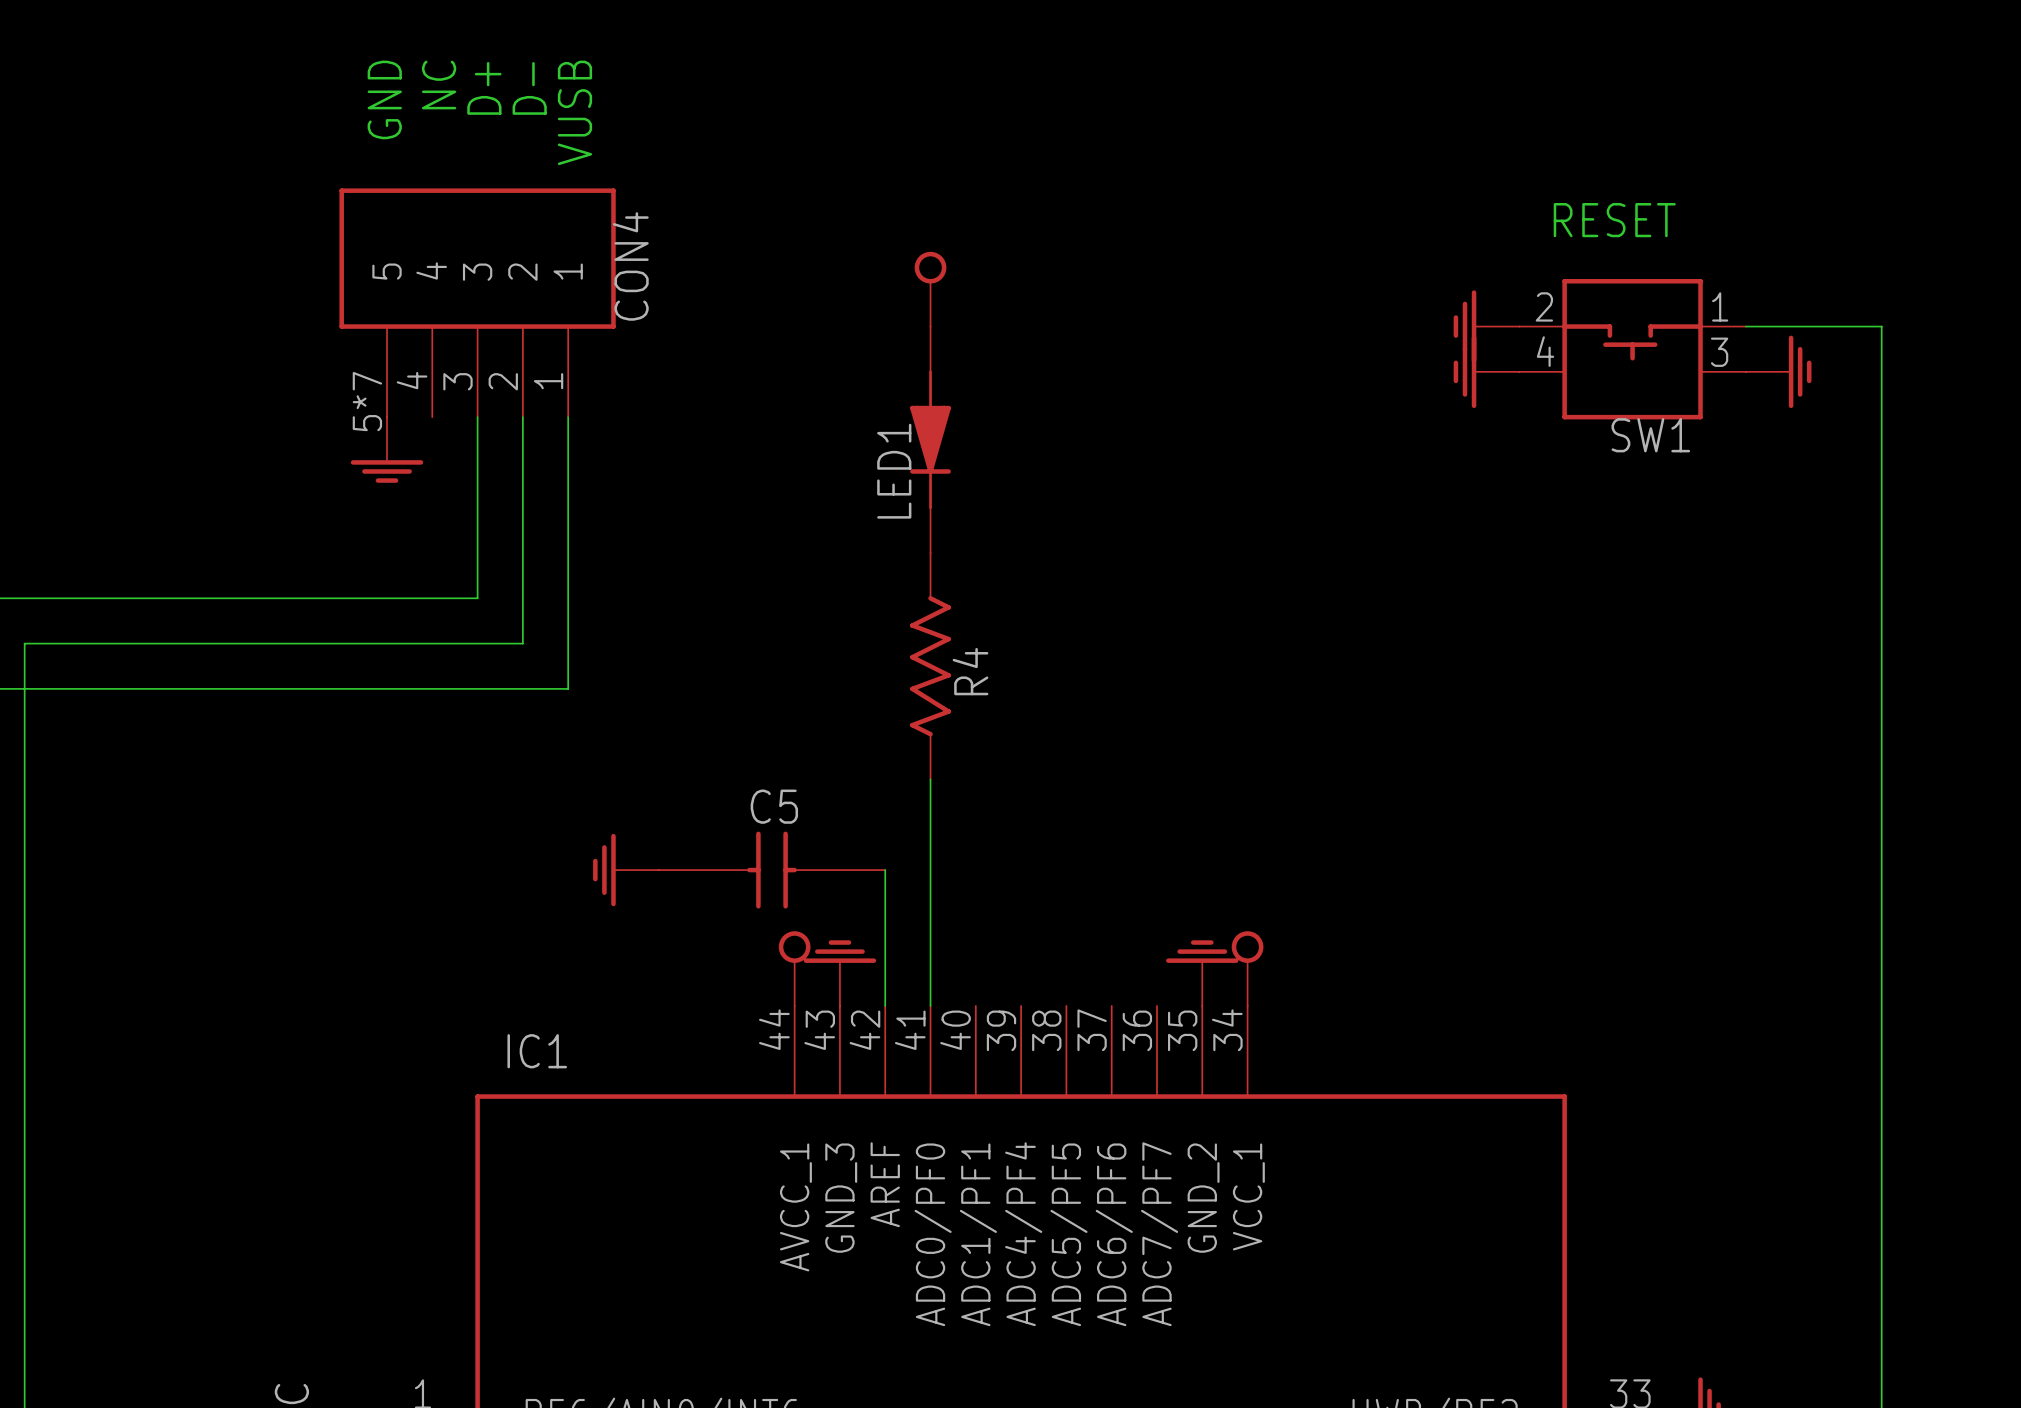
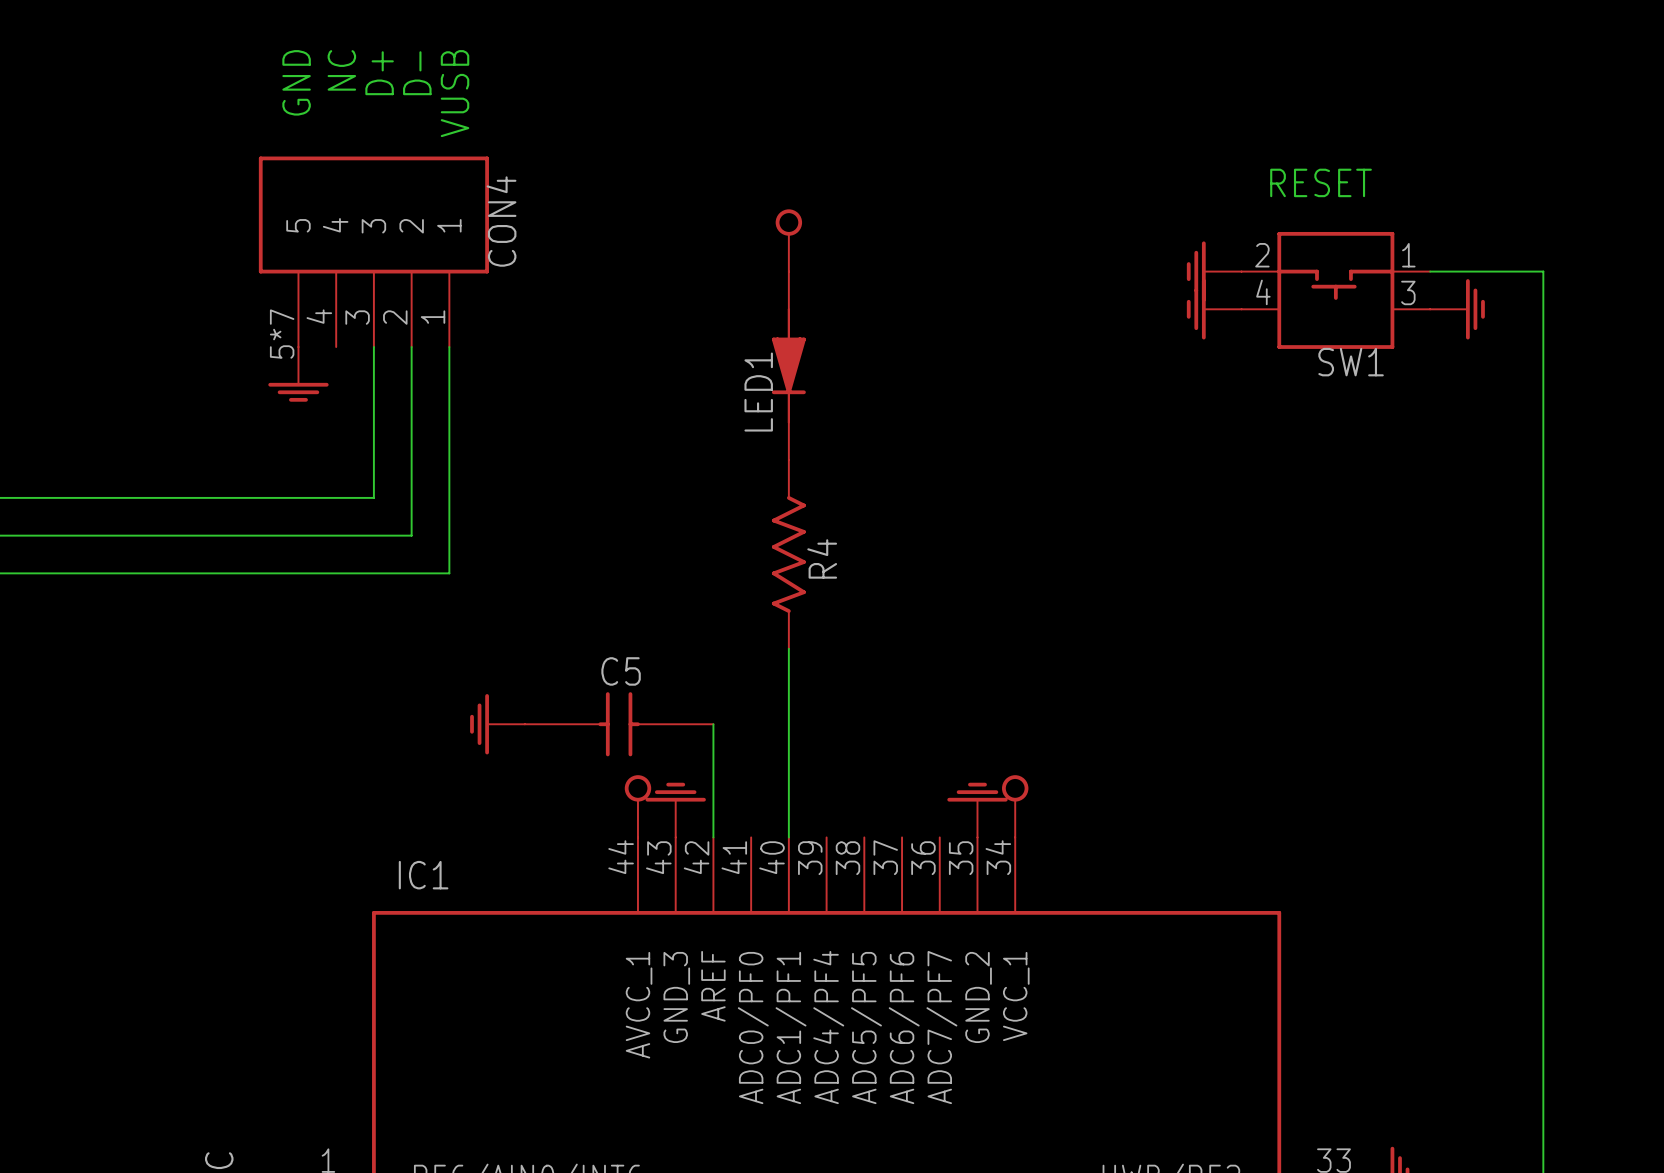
power symbol position: (930, 289) -> (788, 240)
LED1 position: (930, 439) -> (788, 365)
R4 position: (930, 666) -> (788, 554)
wire: (930, 779) (930, 1005) -> (788, 648) (788, 837)

